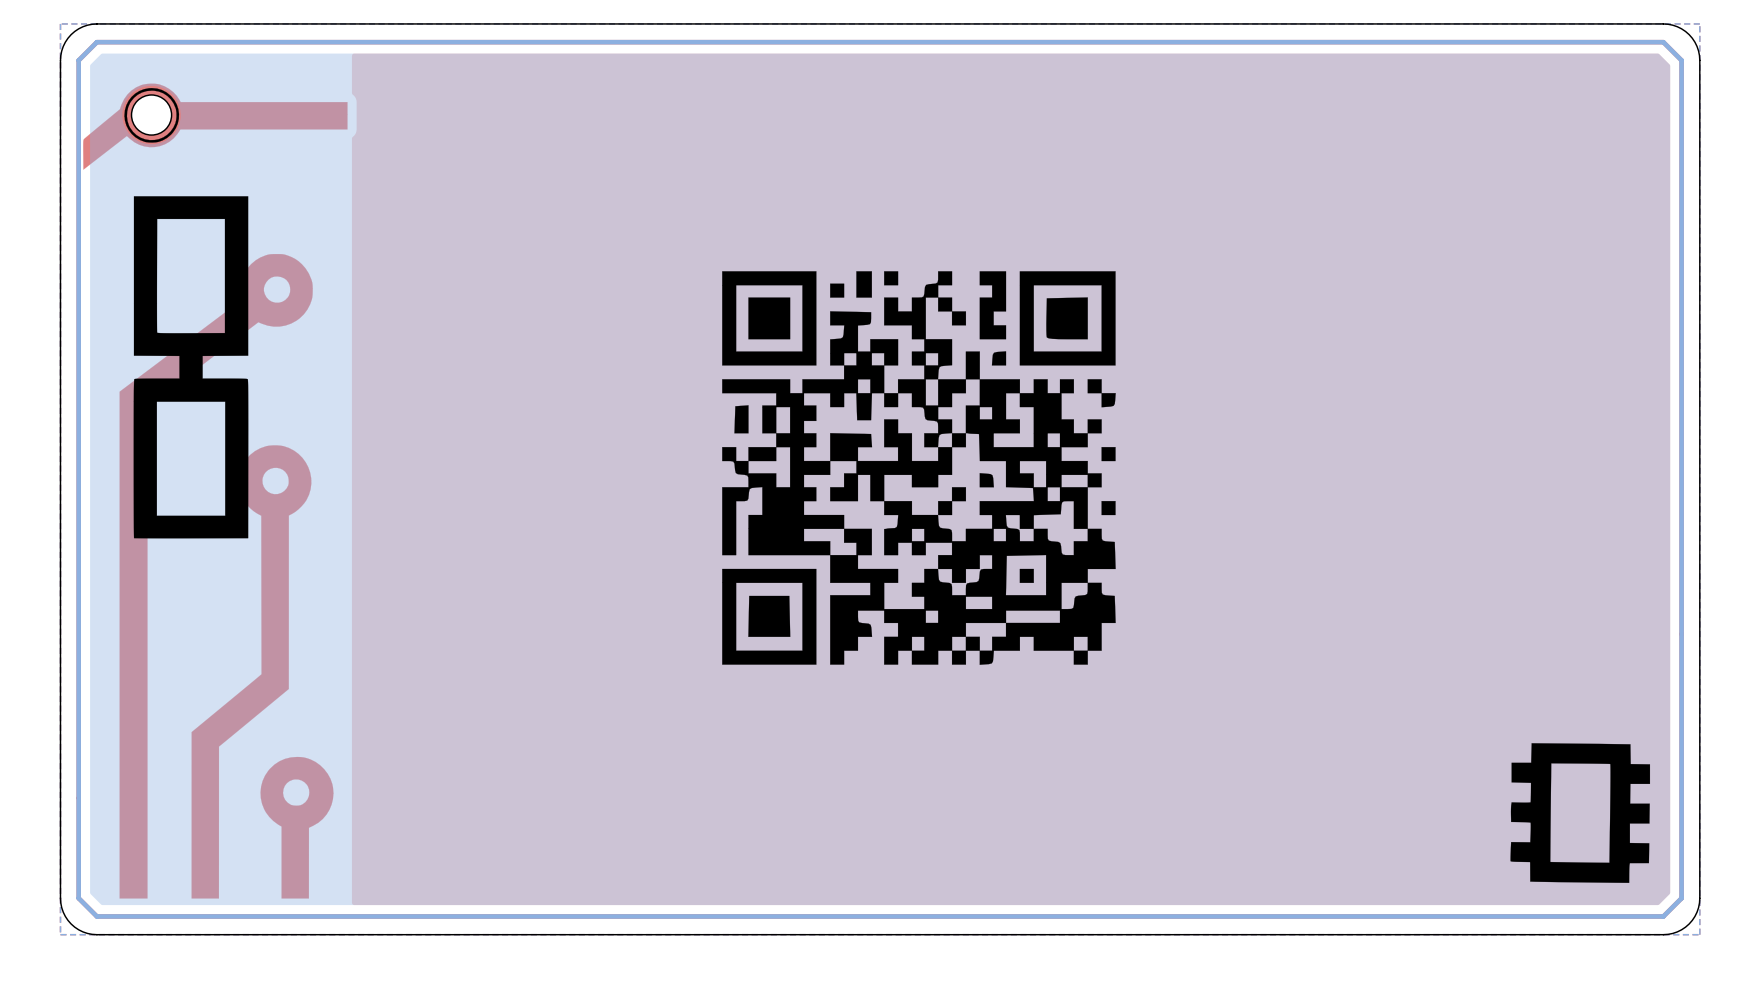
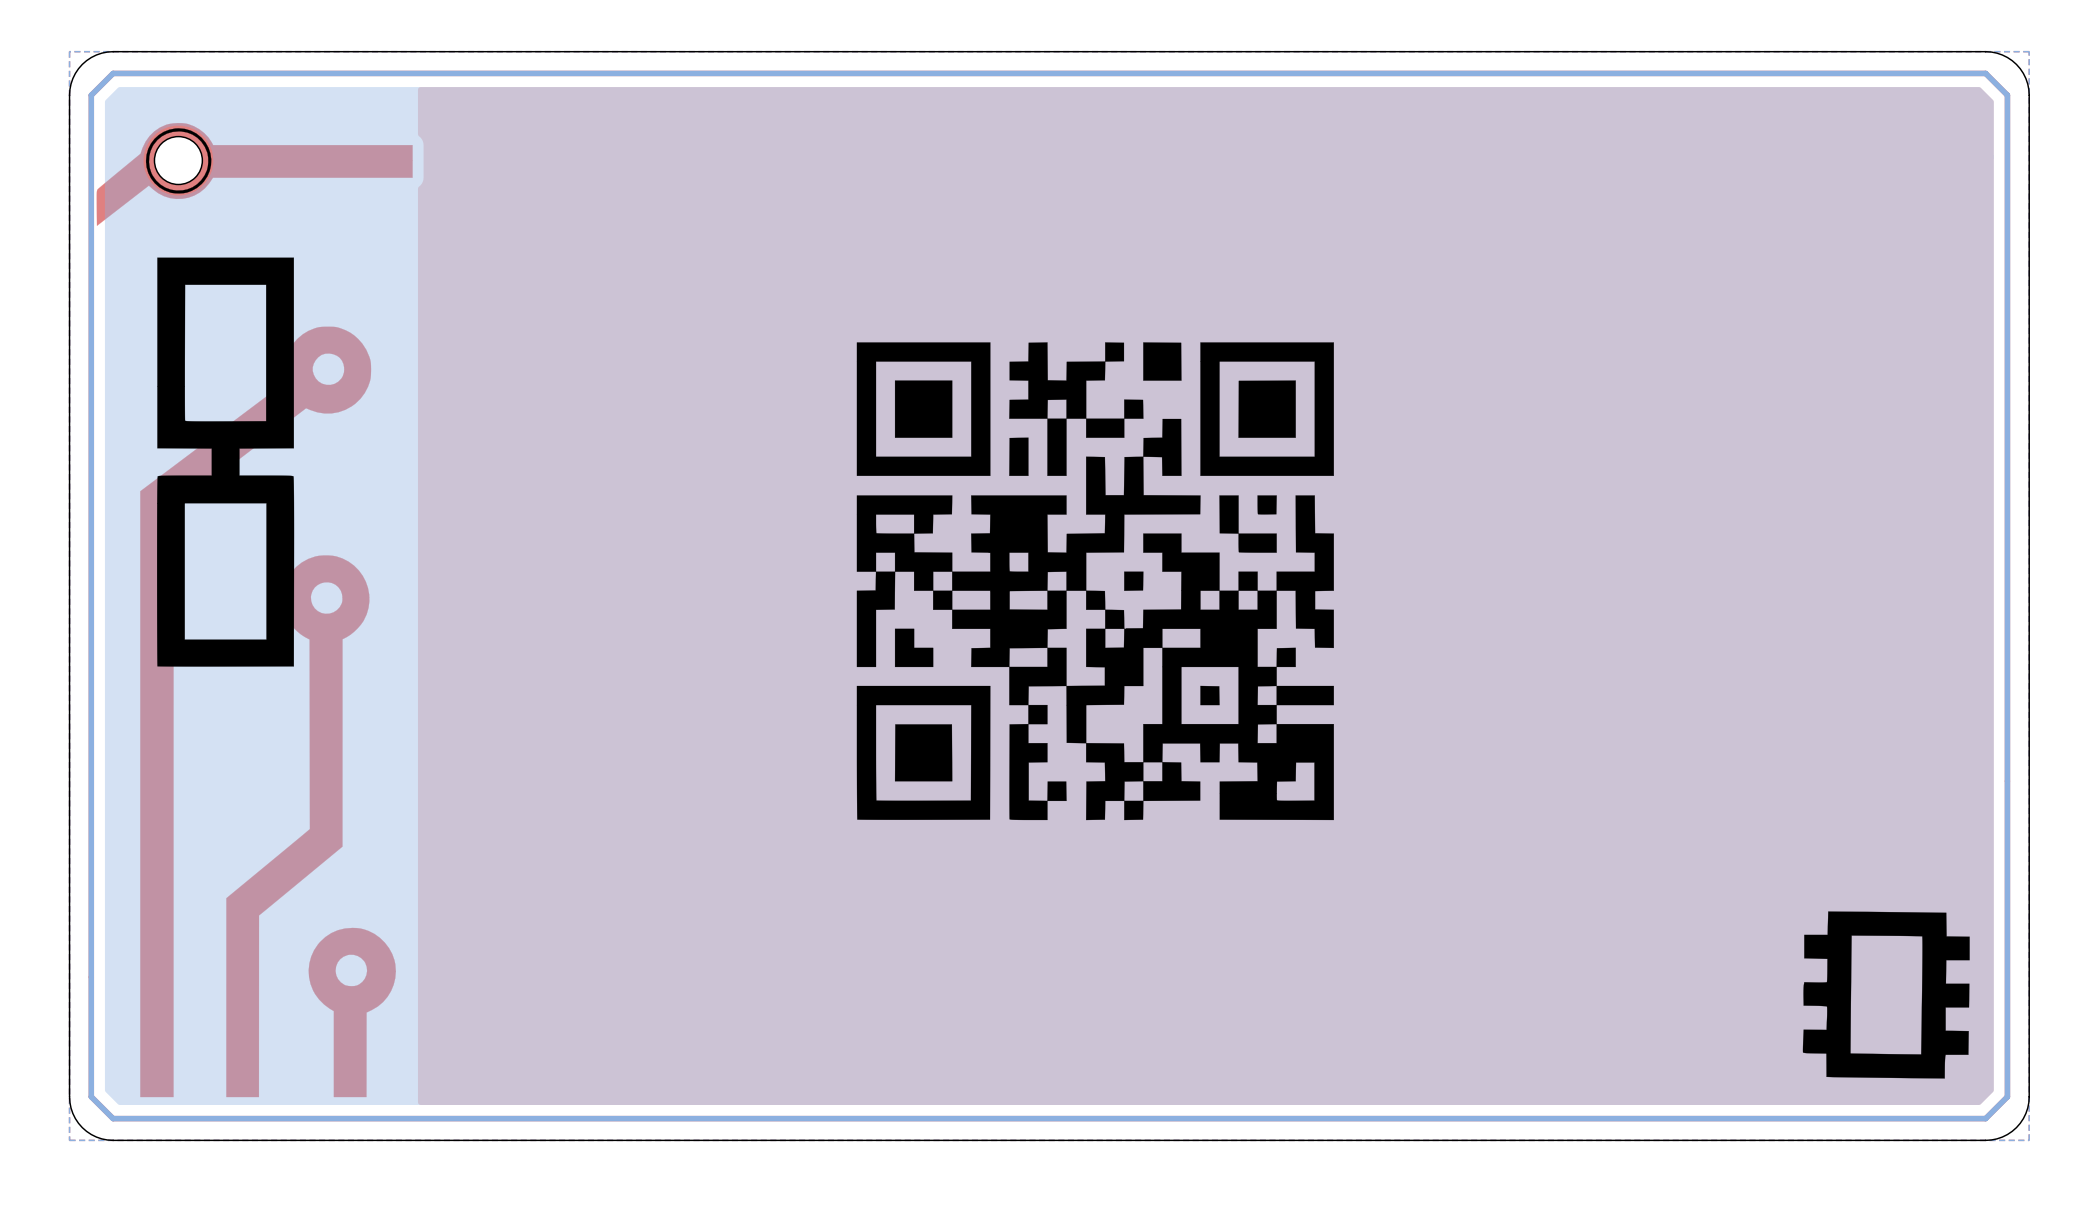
drawing shape: [722, 271, 1116, 665] -> [856, 342, 1334, 821]

